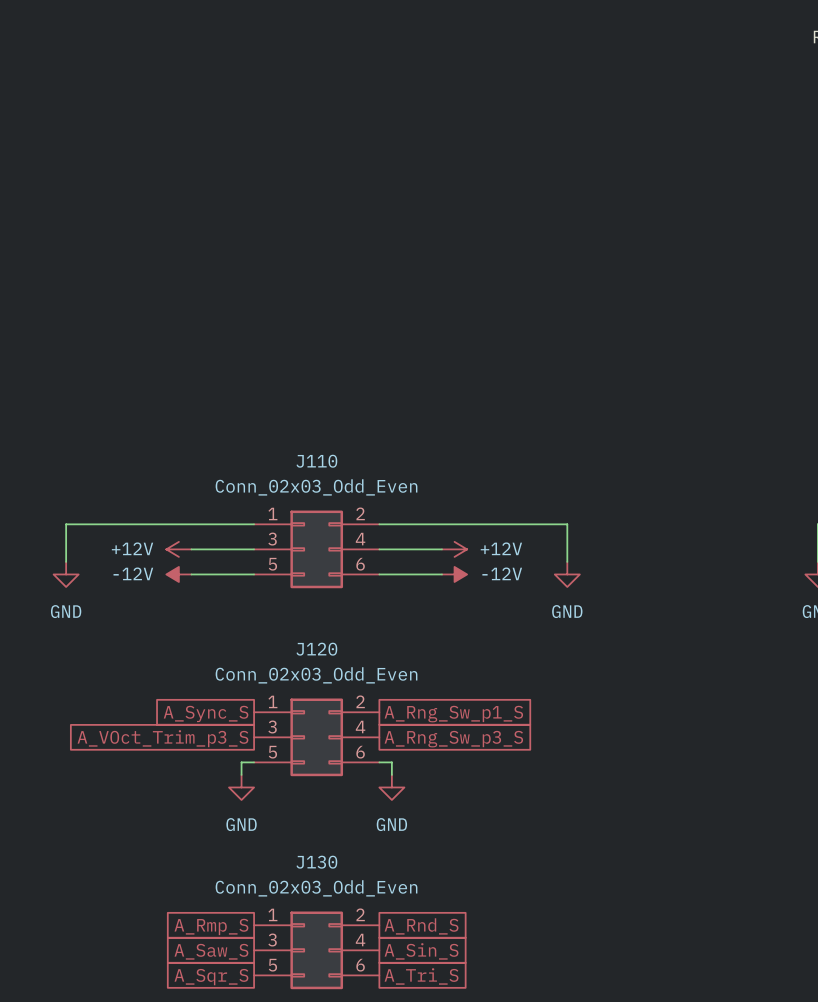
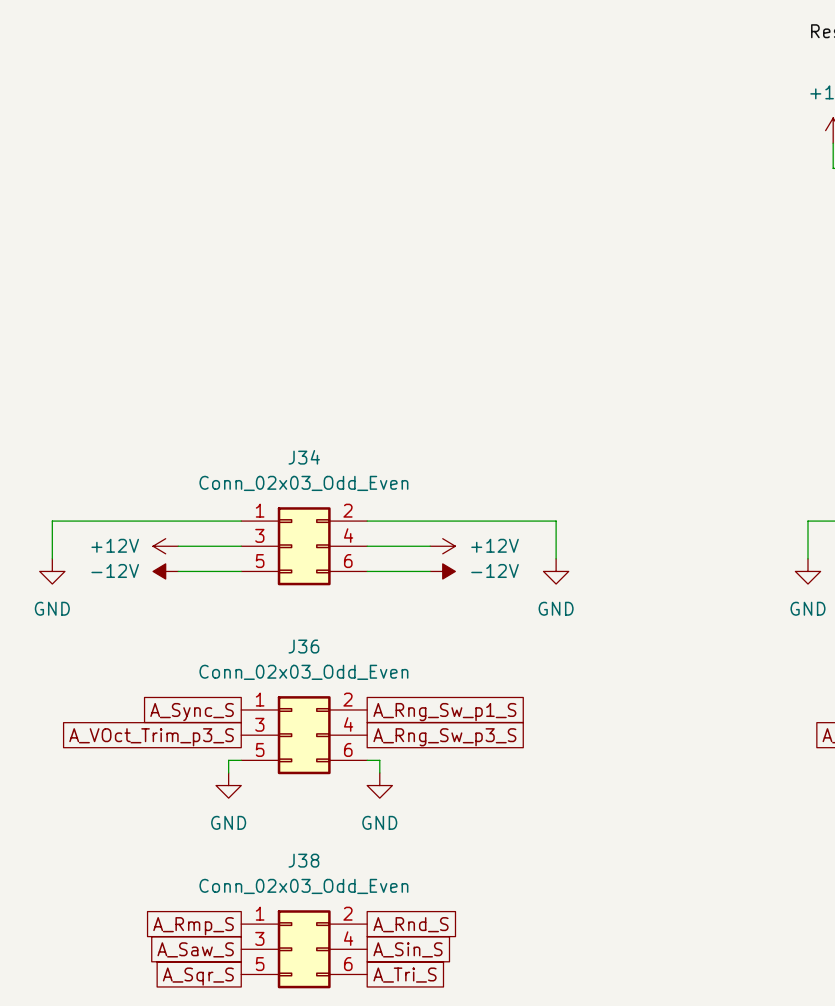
J110 name: J110 (316, 461) -> J34 (304, 457)
J120 name: J120 (316, 649) -> J36 (303, 646)
J130 name: J130 (316, 862) -> J38 (303, 860)

